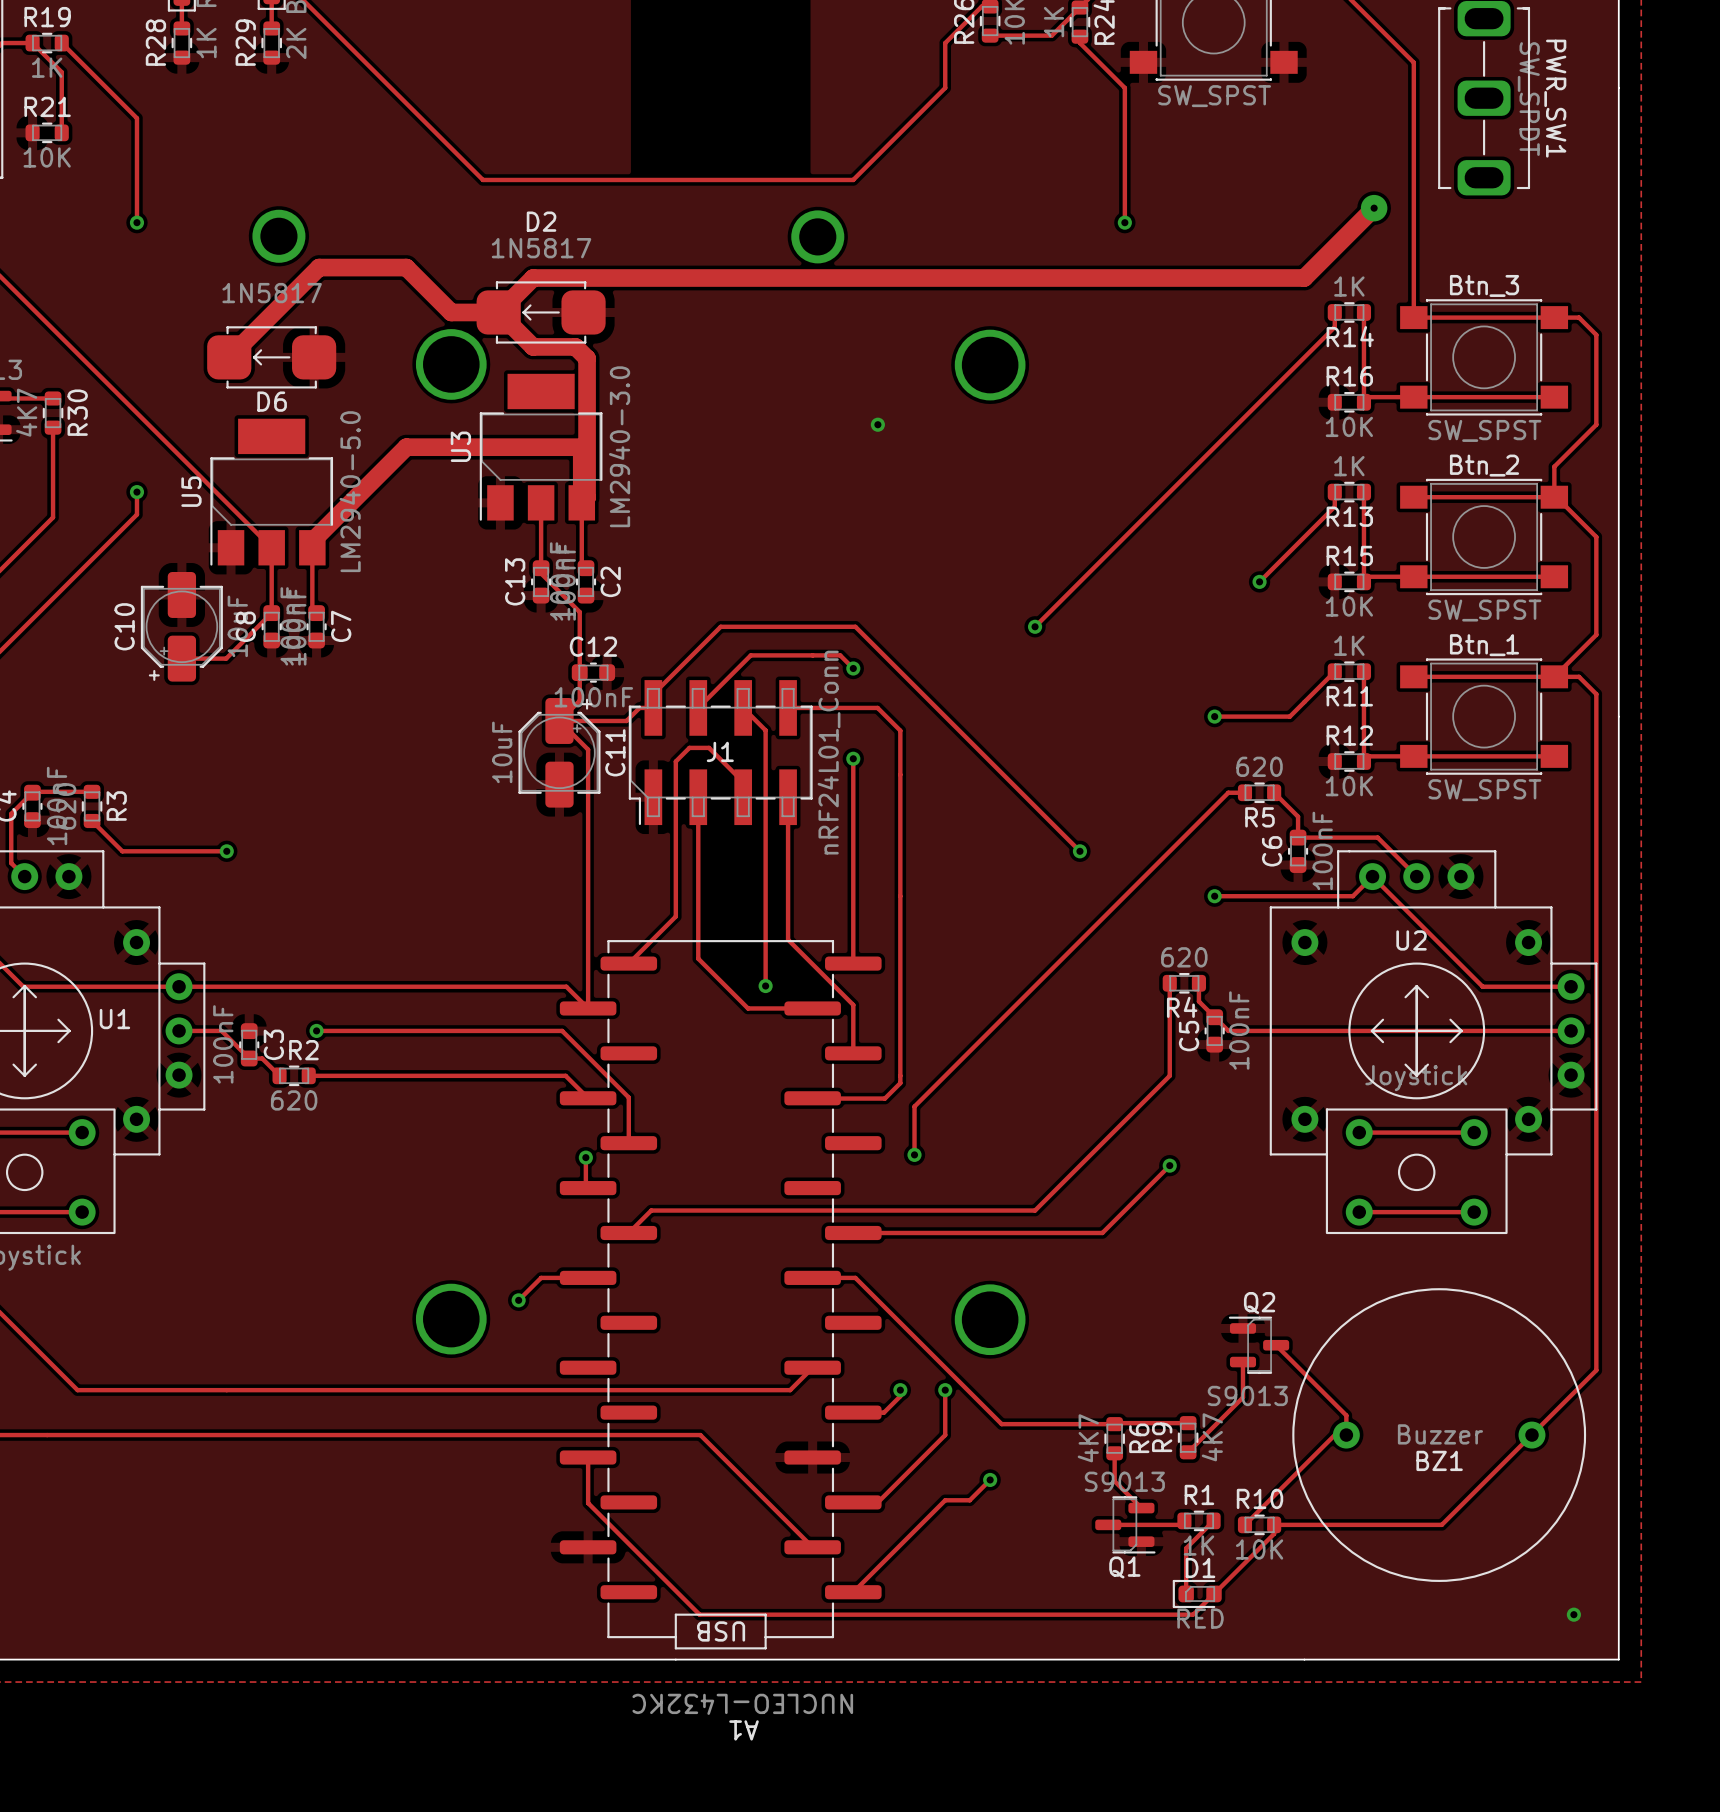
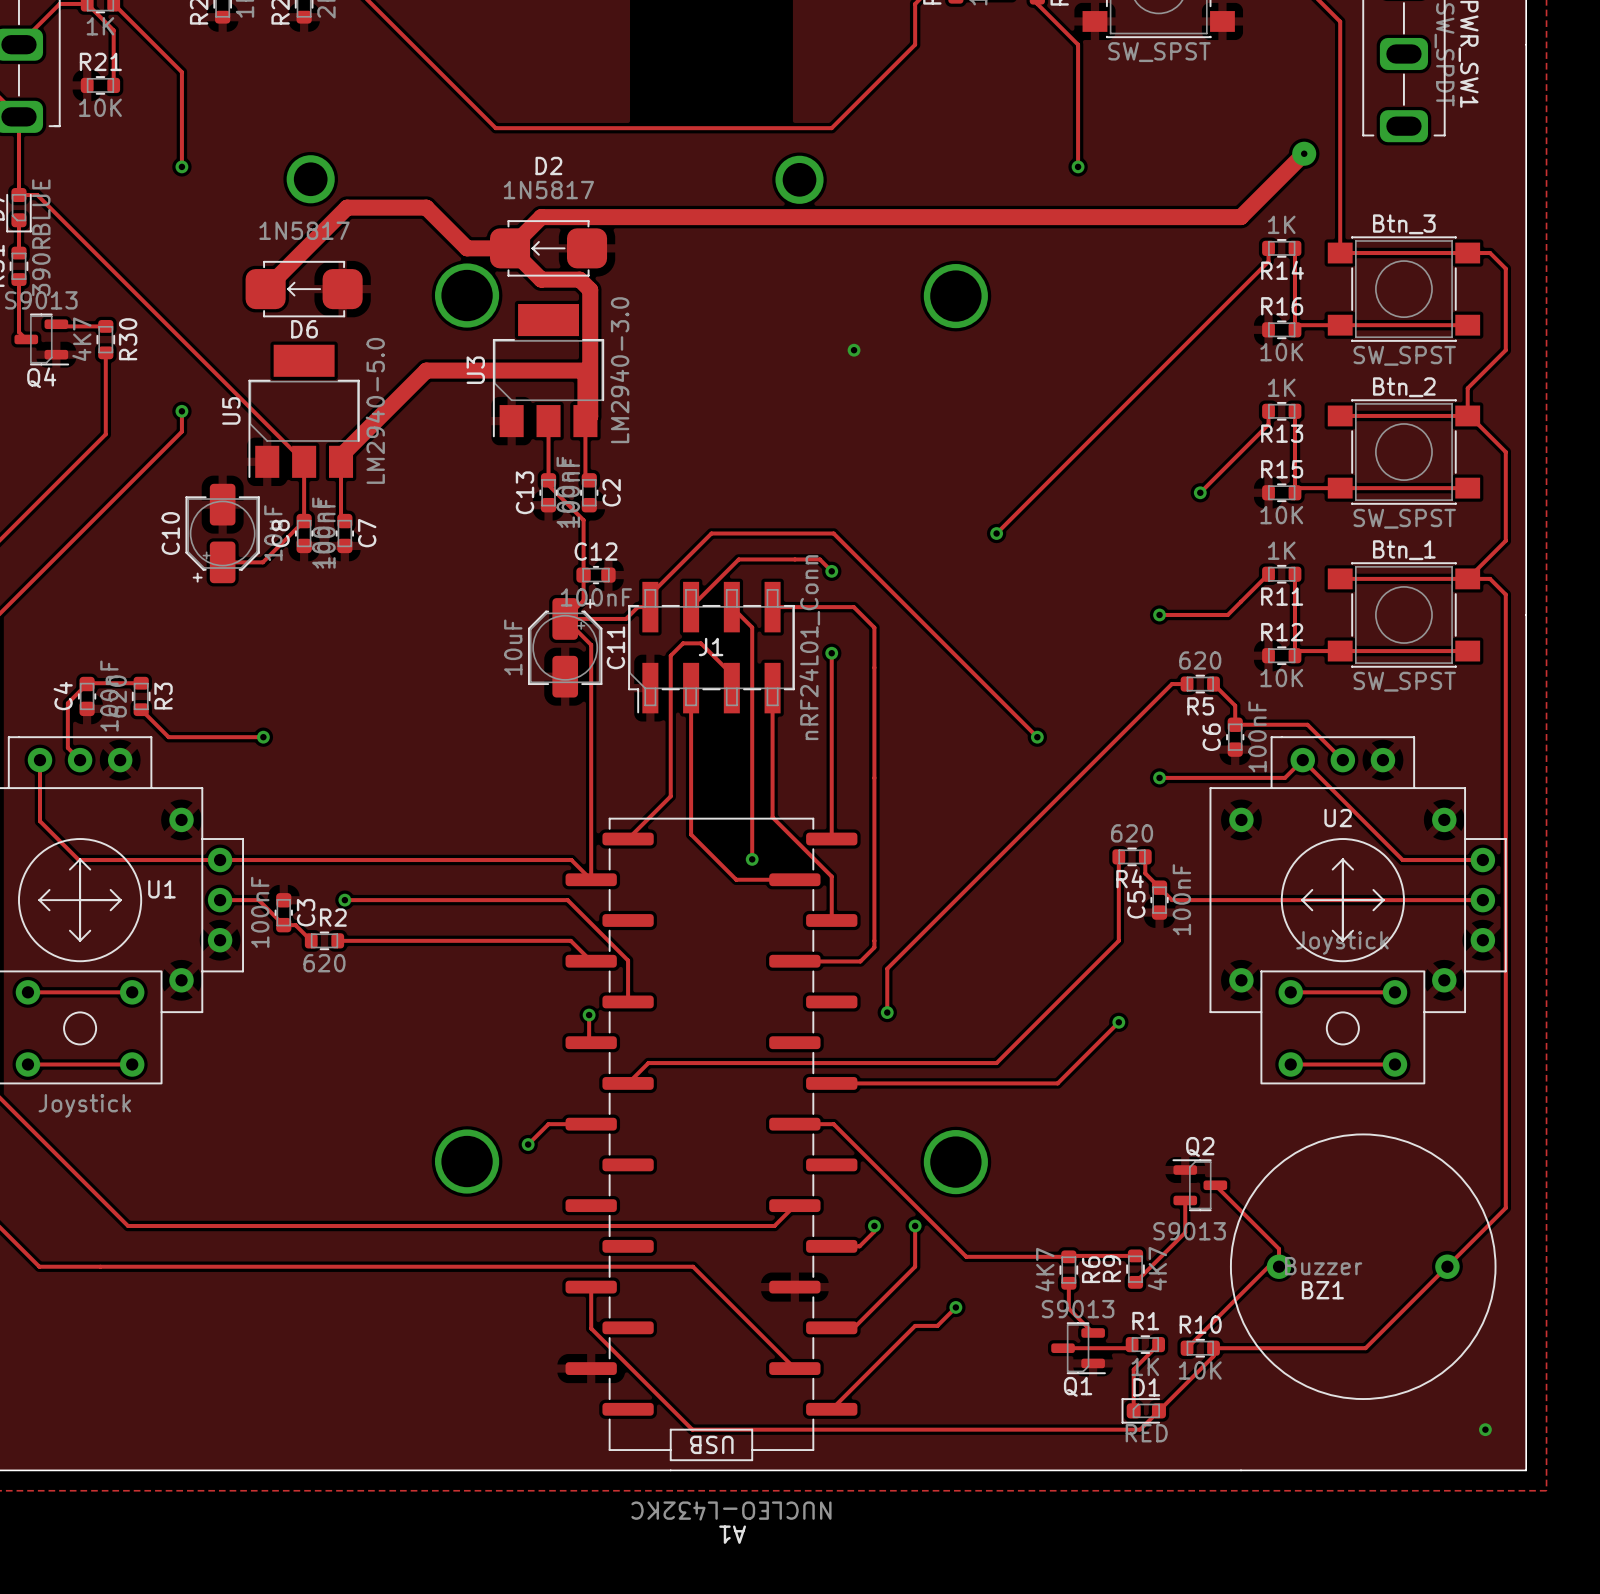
BZ1 value position: Buzzer (1440, 1434) -> Buzzer (1323, 1266)
BZ1 name position: BZ1 (1439, 1460) -> BZ1 (1322, 1290)

